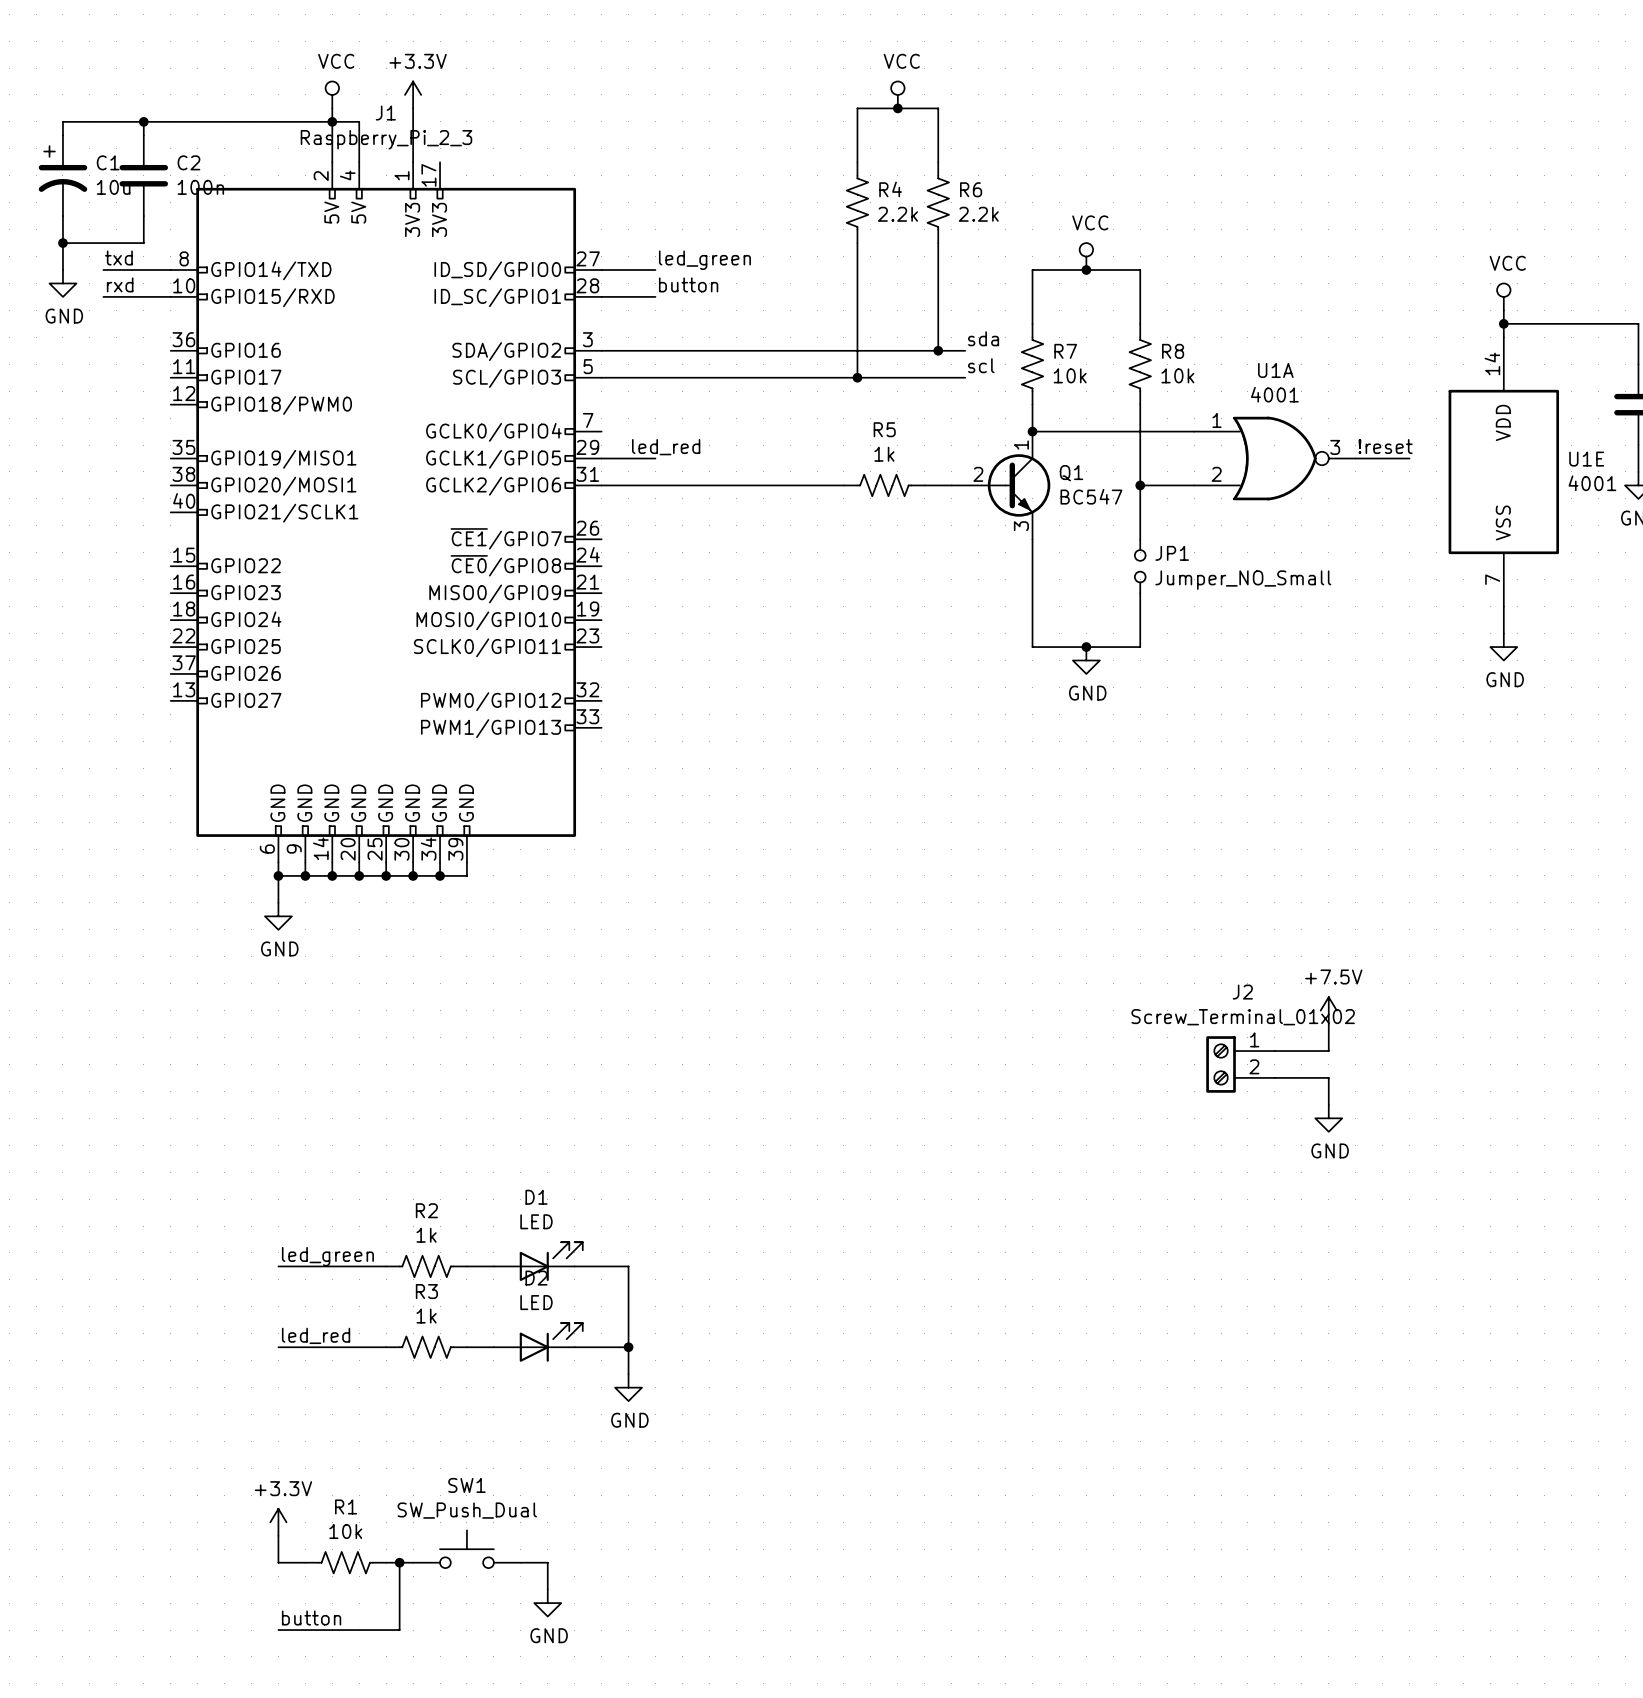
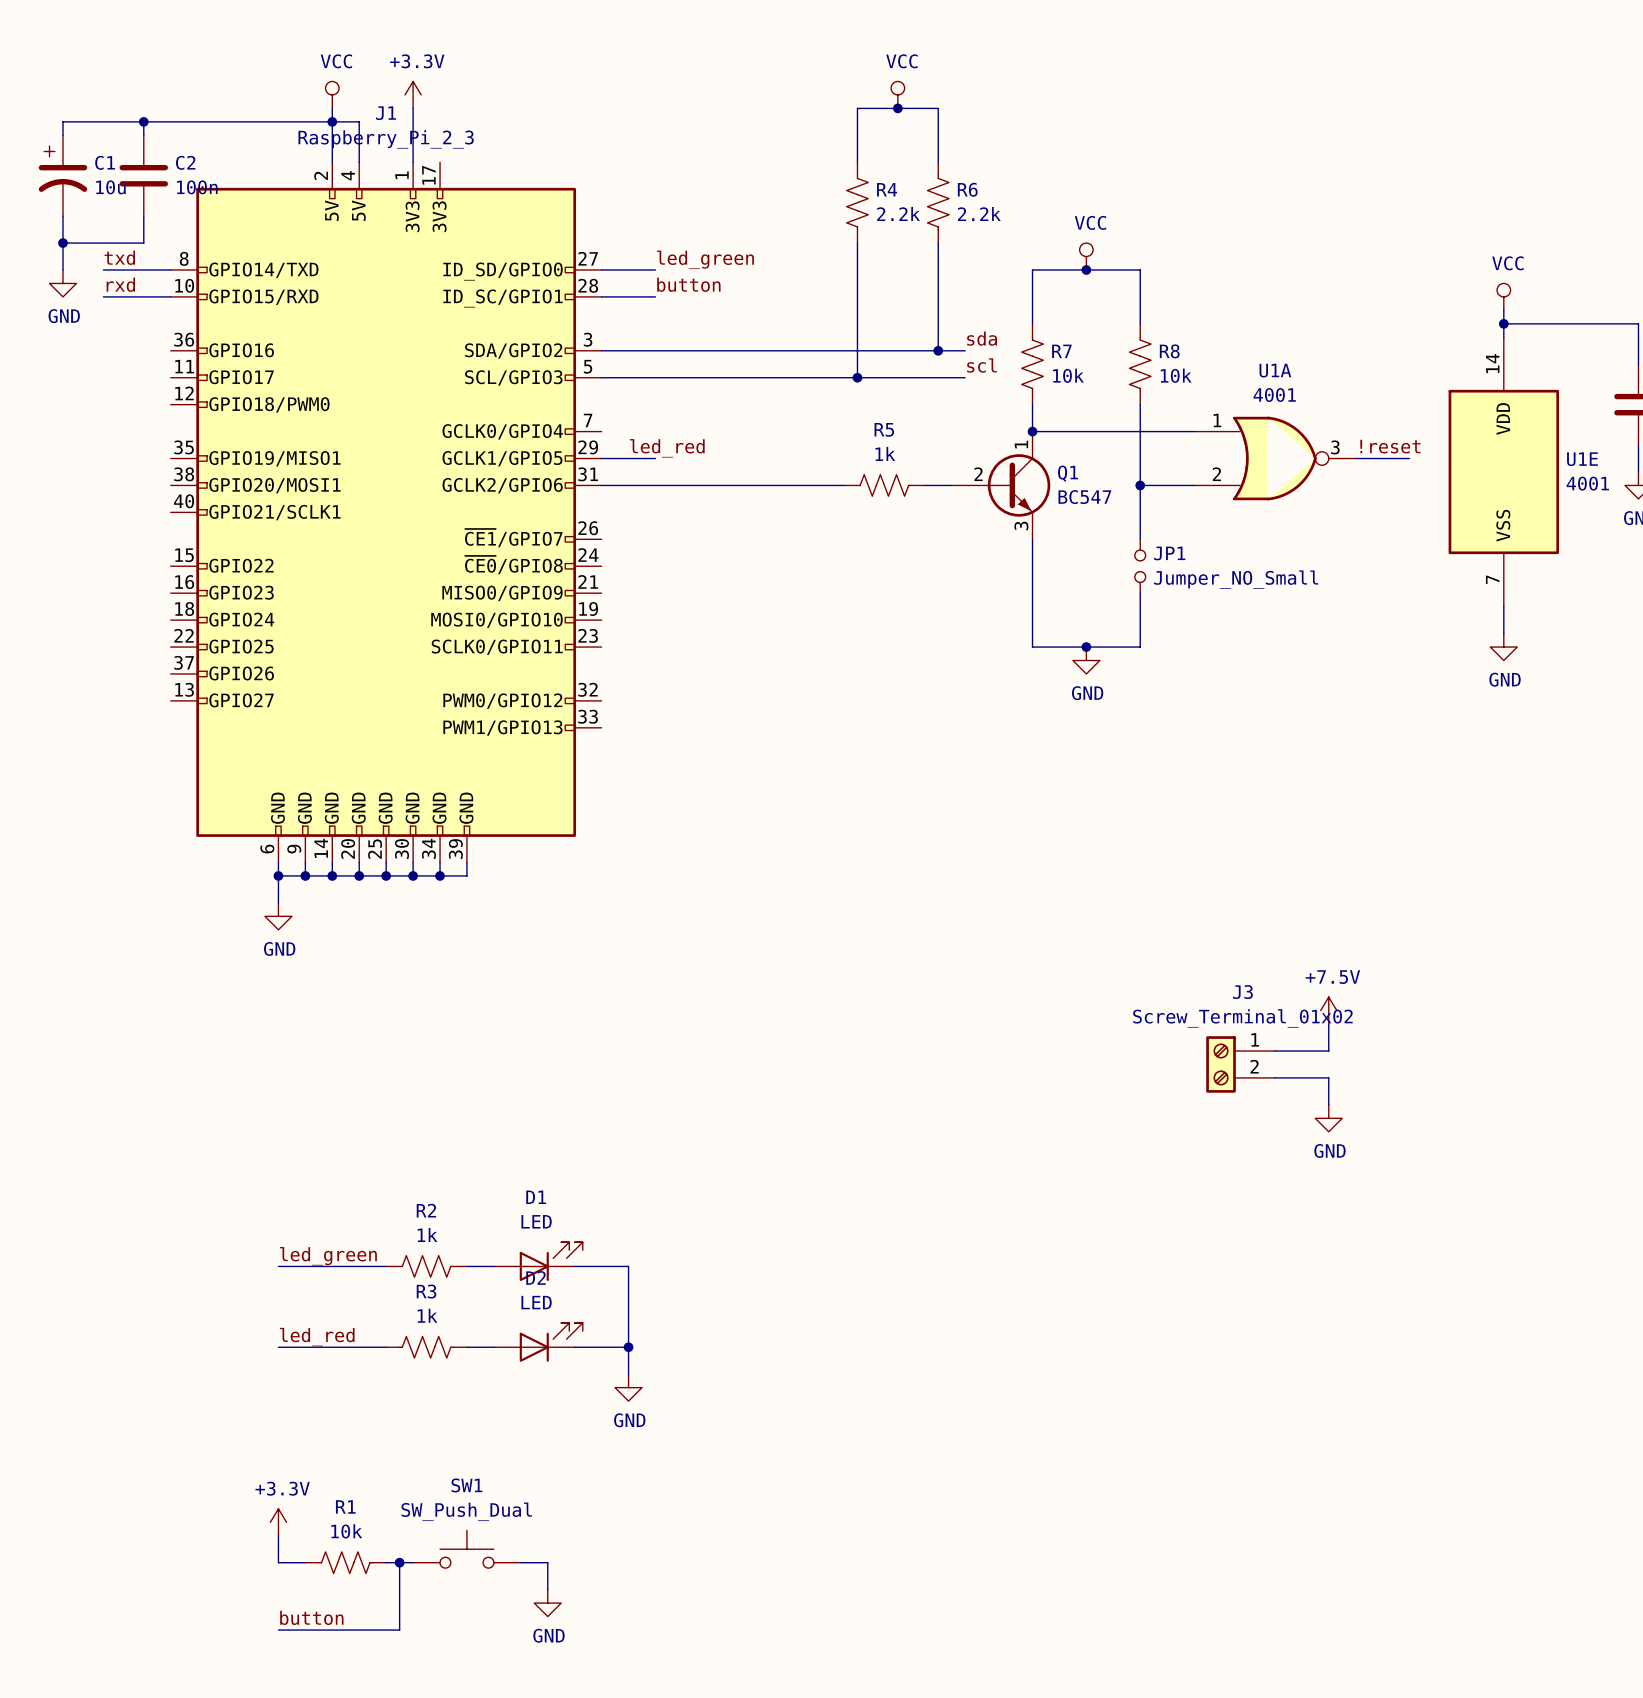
J2 name: J2 (1242, 992) -> J3 (1242, 992)

